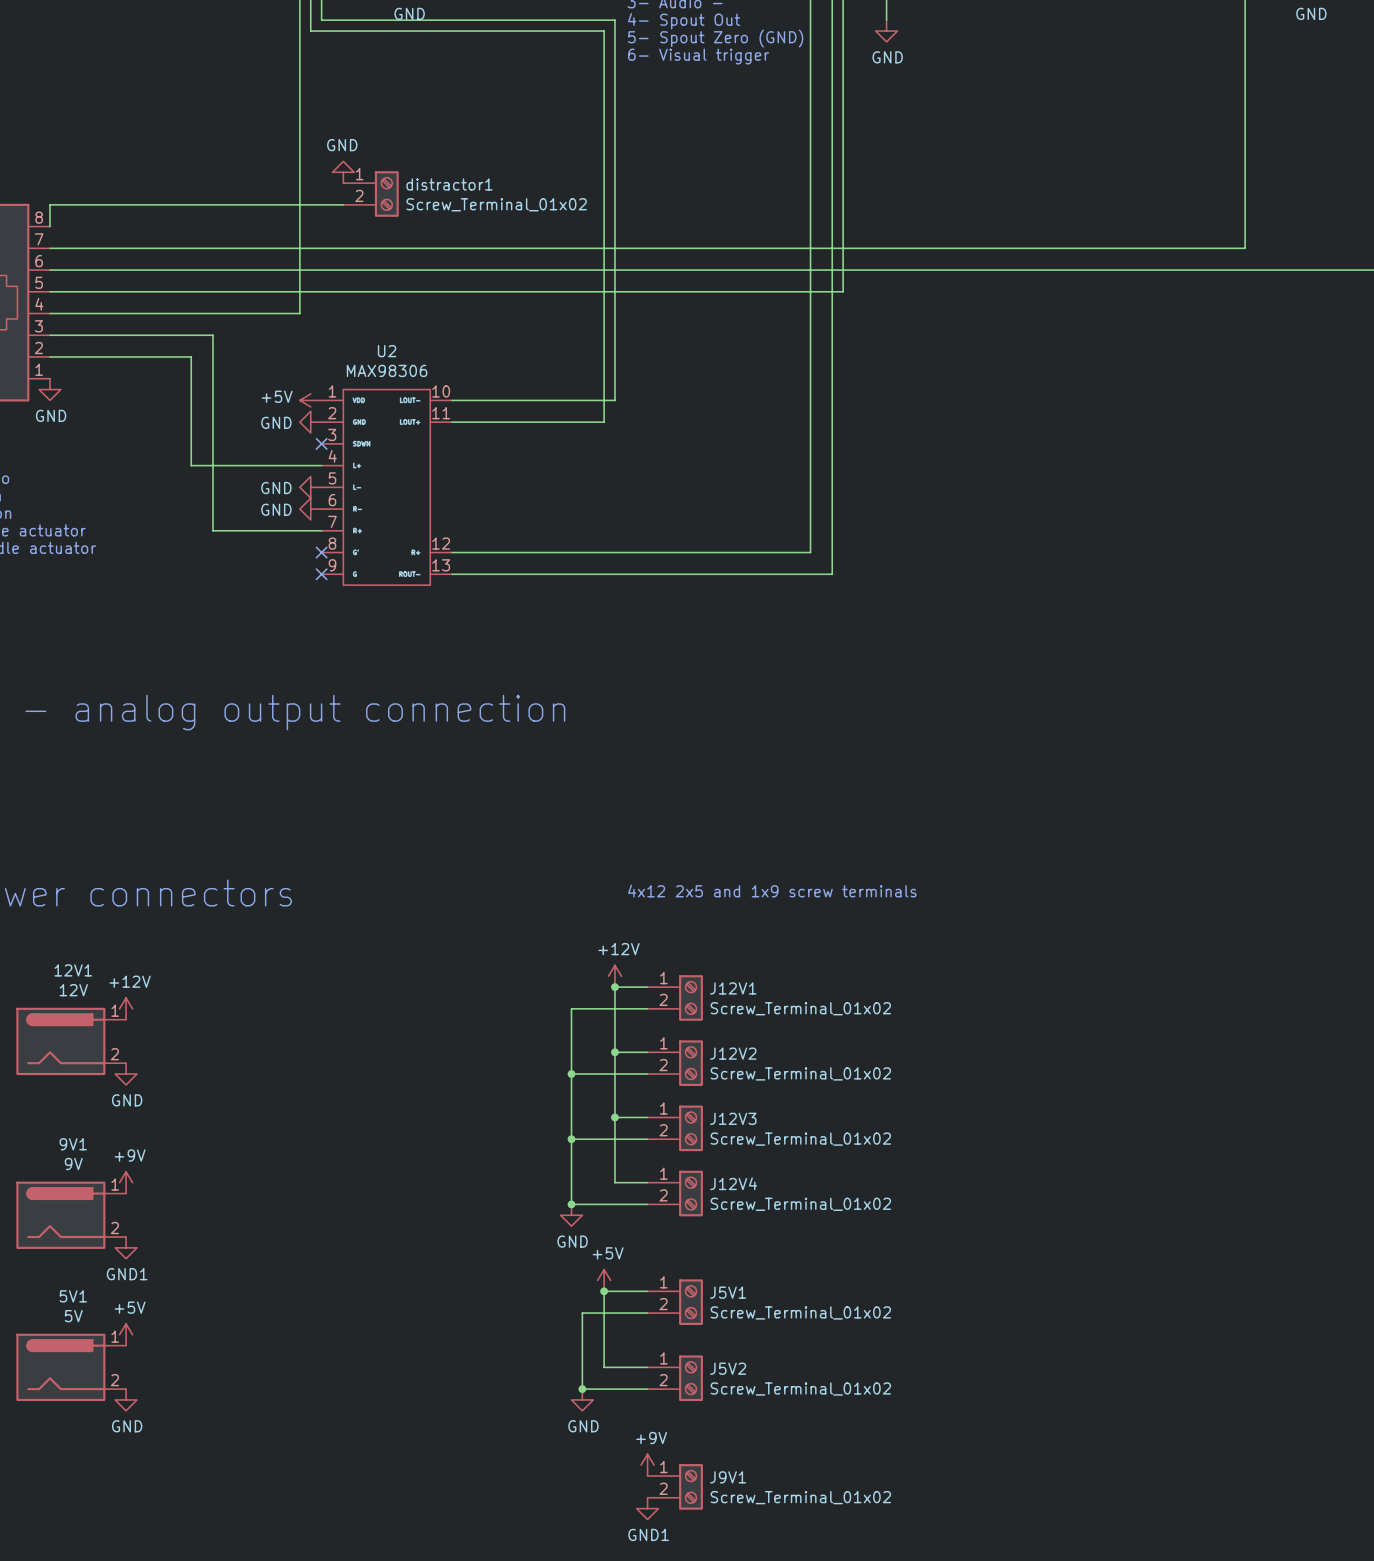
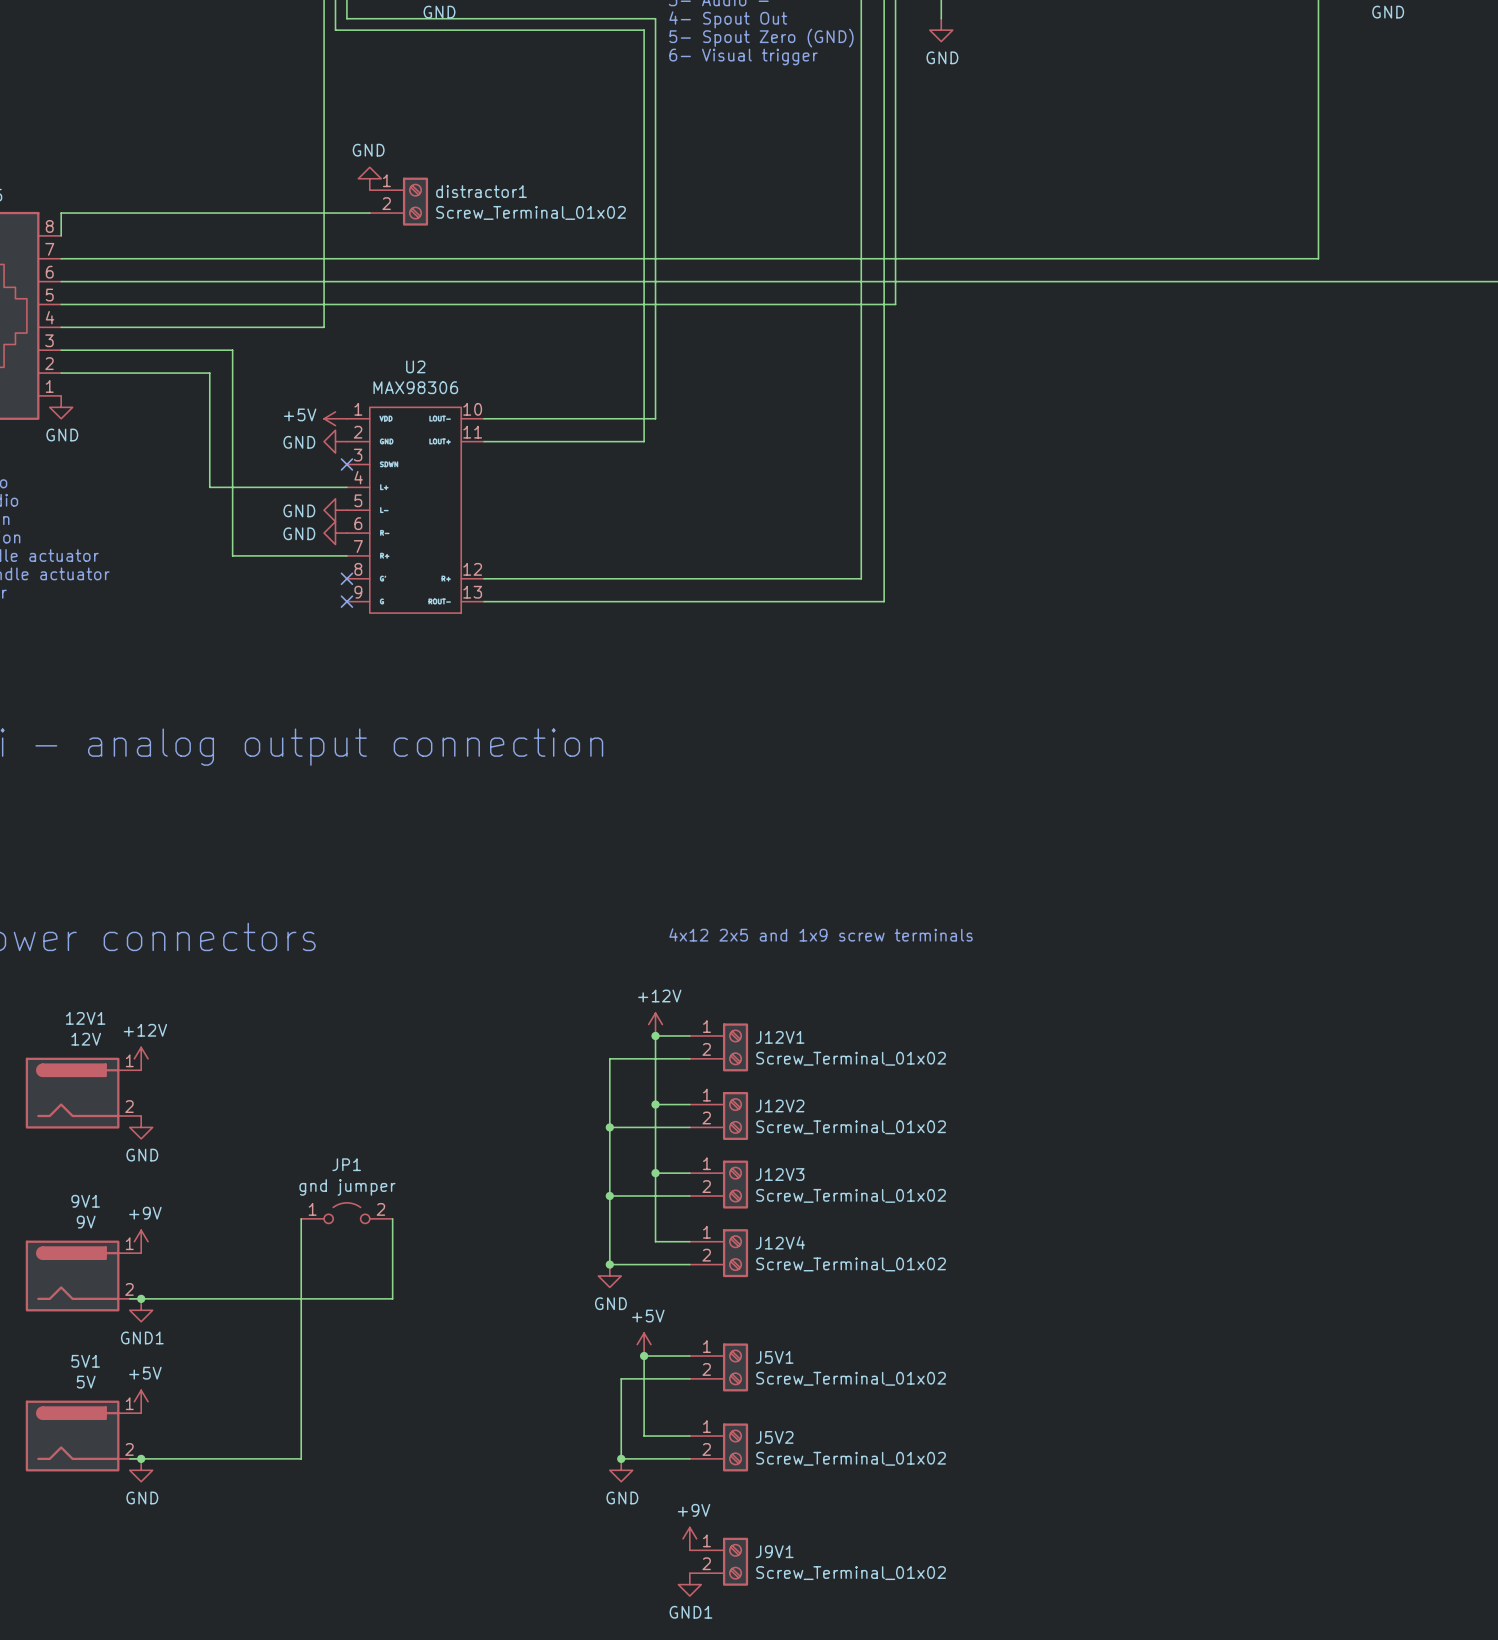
JP1: none -> gnd jumper (346, 1213)
wire: none -> (301, 1218) (301, 1458) (129, 1458)
wire: none -> (392, 1218) (392, 1298) (129, 1298)
junction: none -> (141, 1298)
junction: none -> (141, 1458)

